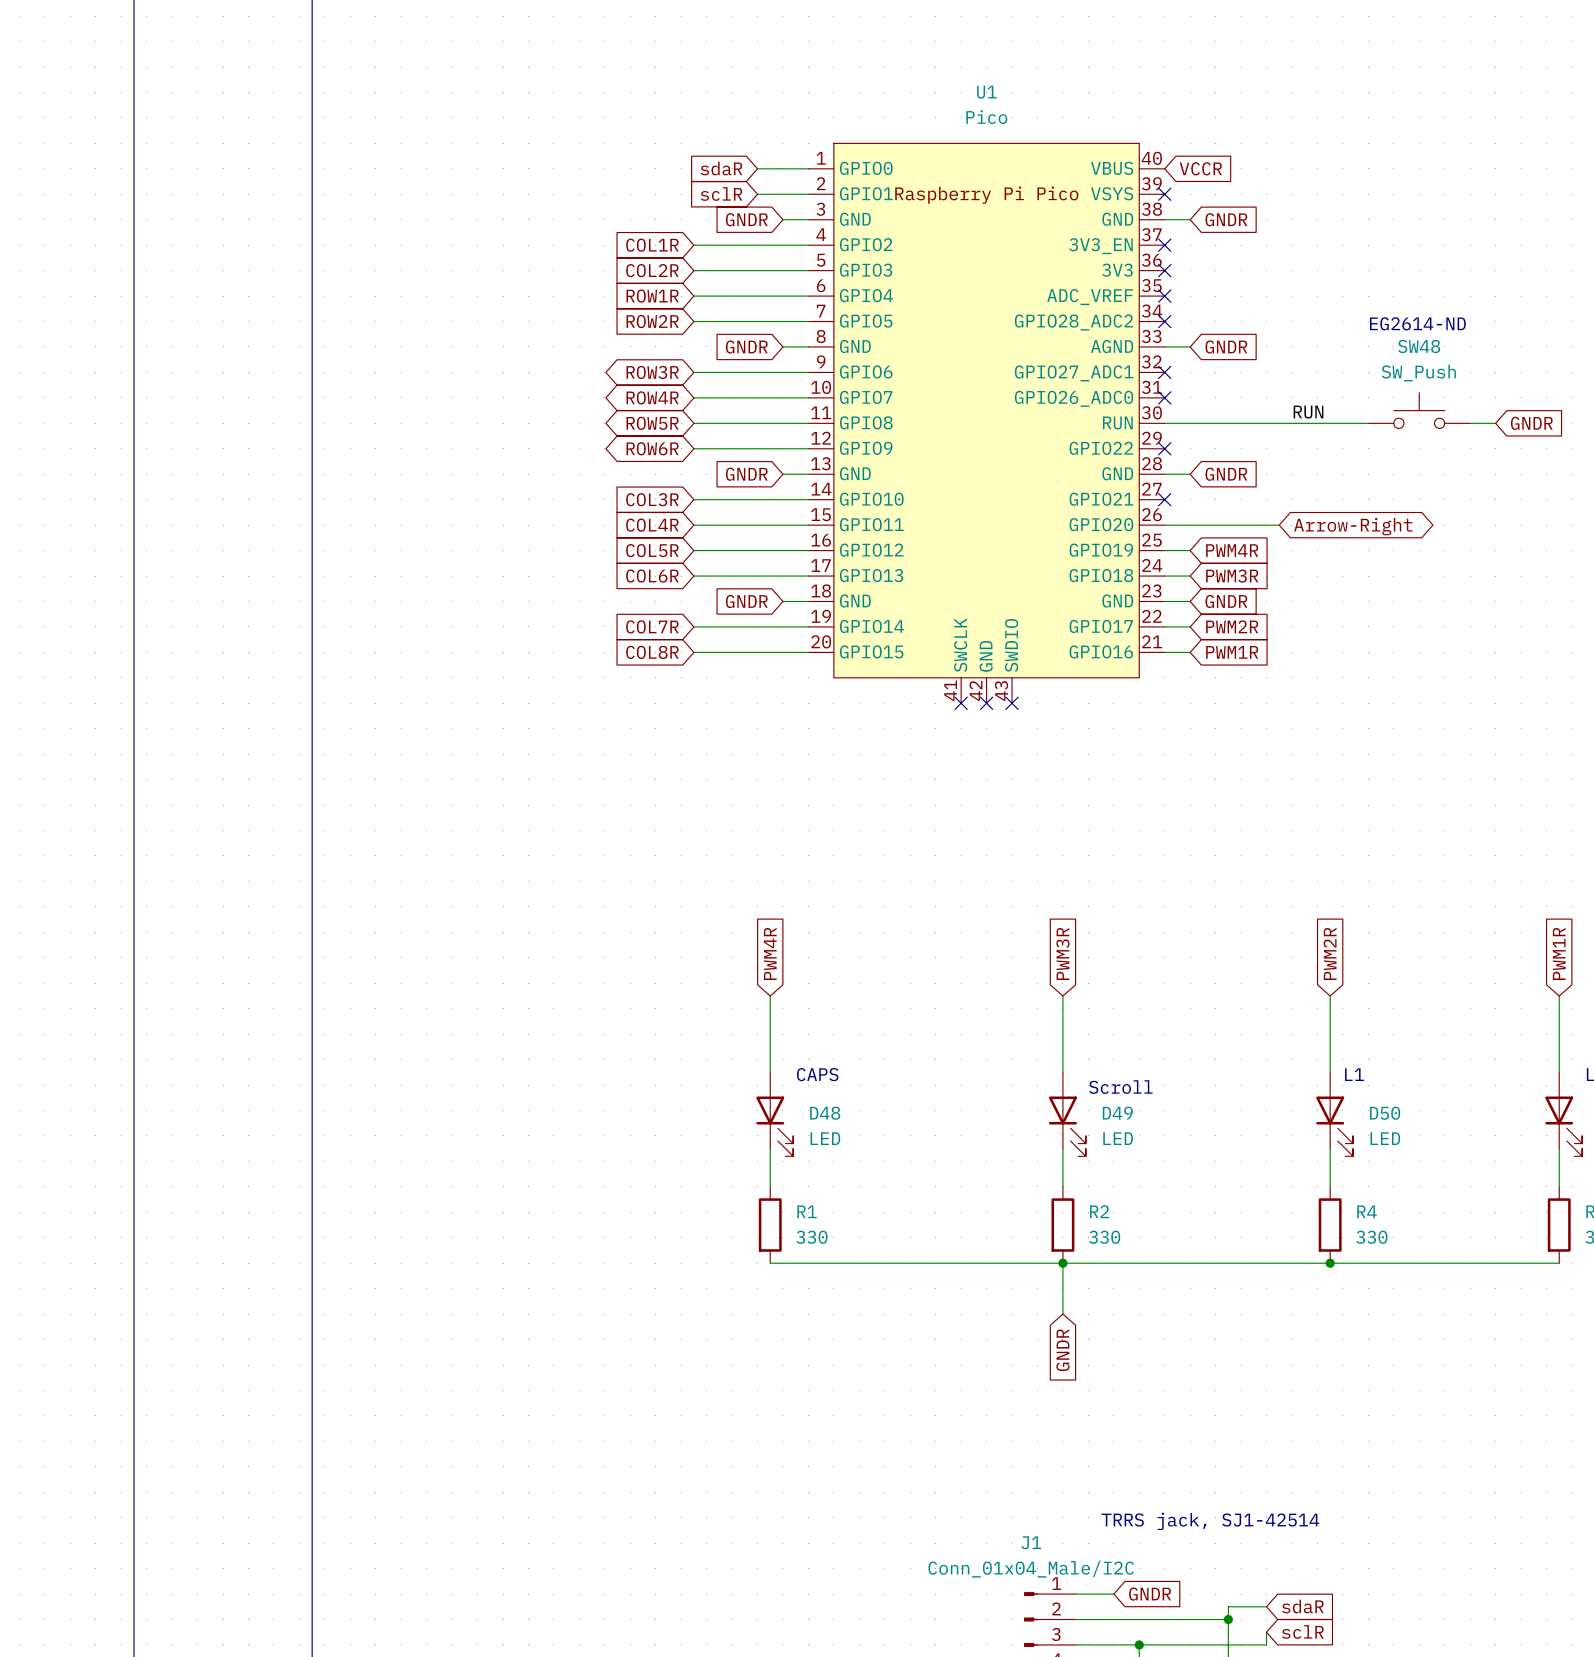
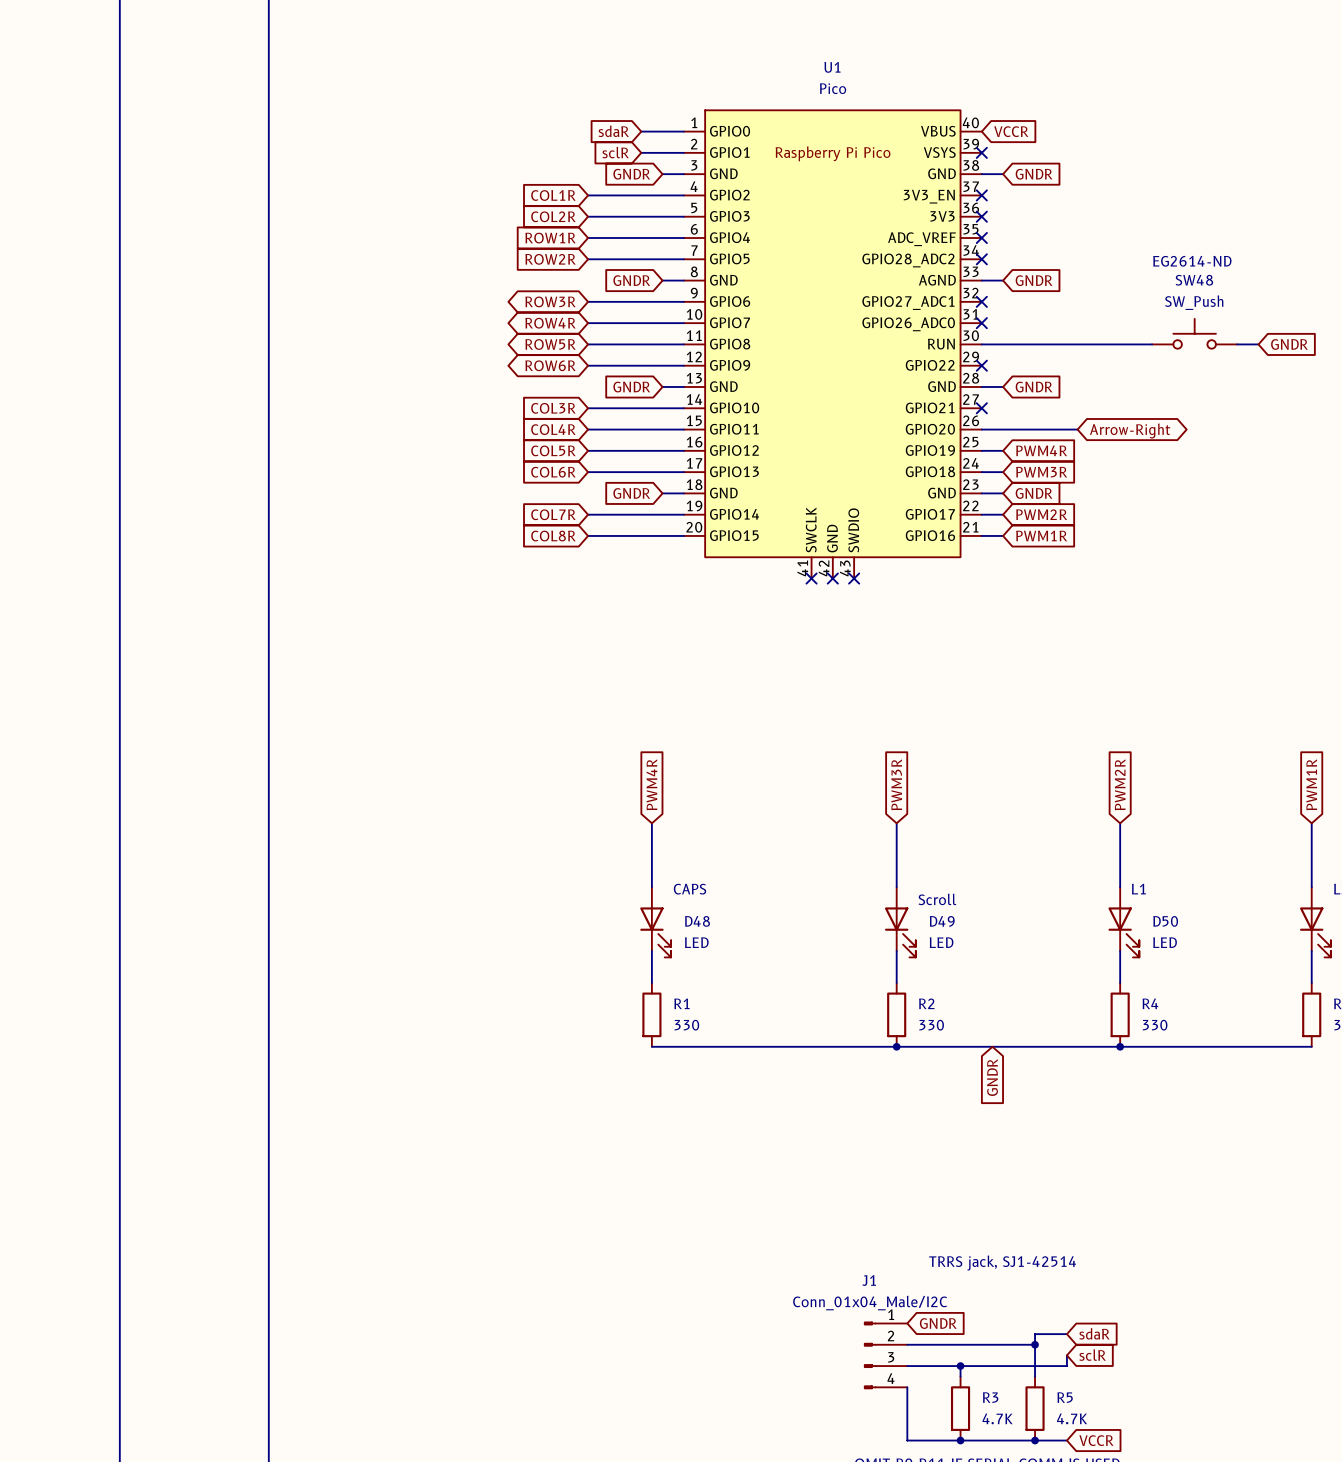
label: RUN (1308, 412) -> none
wire: (1062, 1263) (1062, 1314) -> none
global label position: GNDR (1062, 1350) -> GNDR (992, 1077)
wire: (1075, 1594) (1113, 1594) -> none
global label position: GNDR (1150, 1594) -> GNDR (938, 1323)

